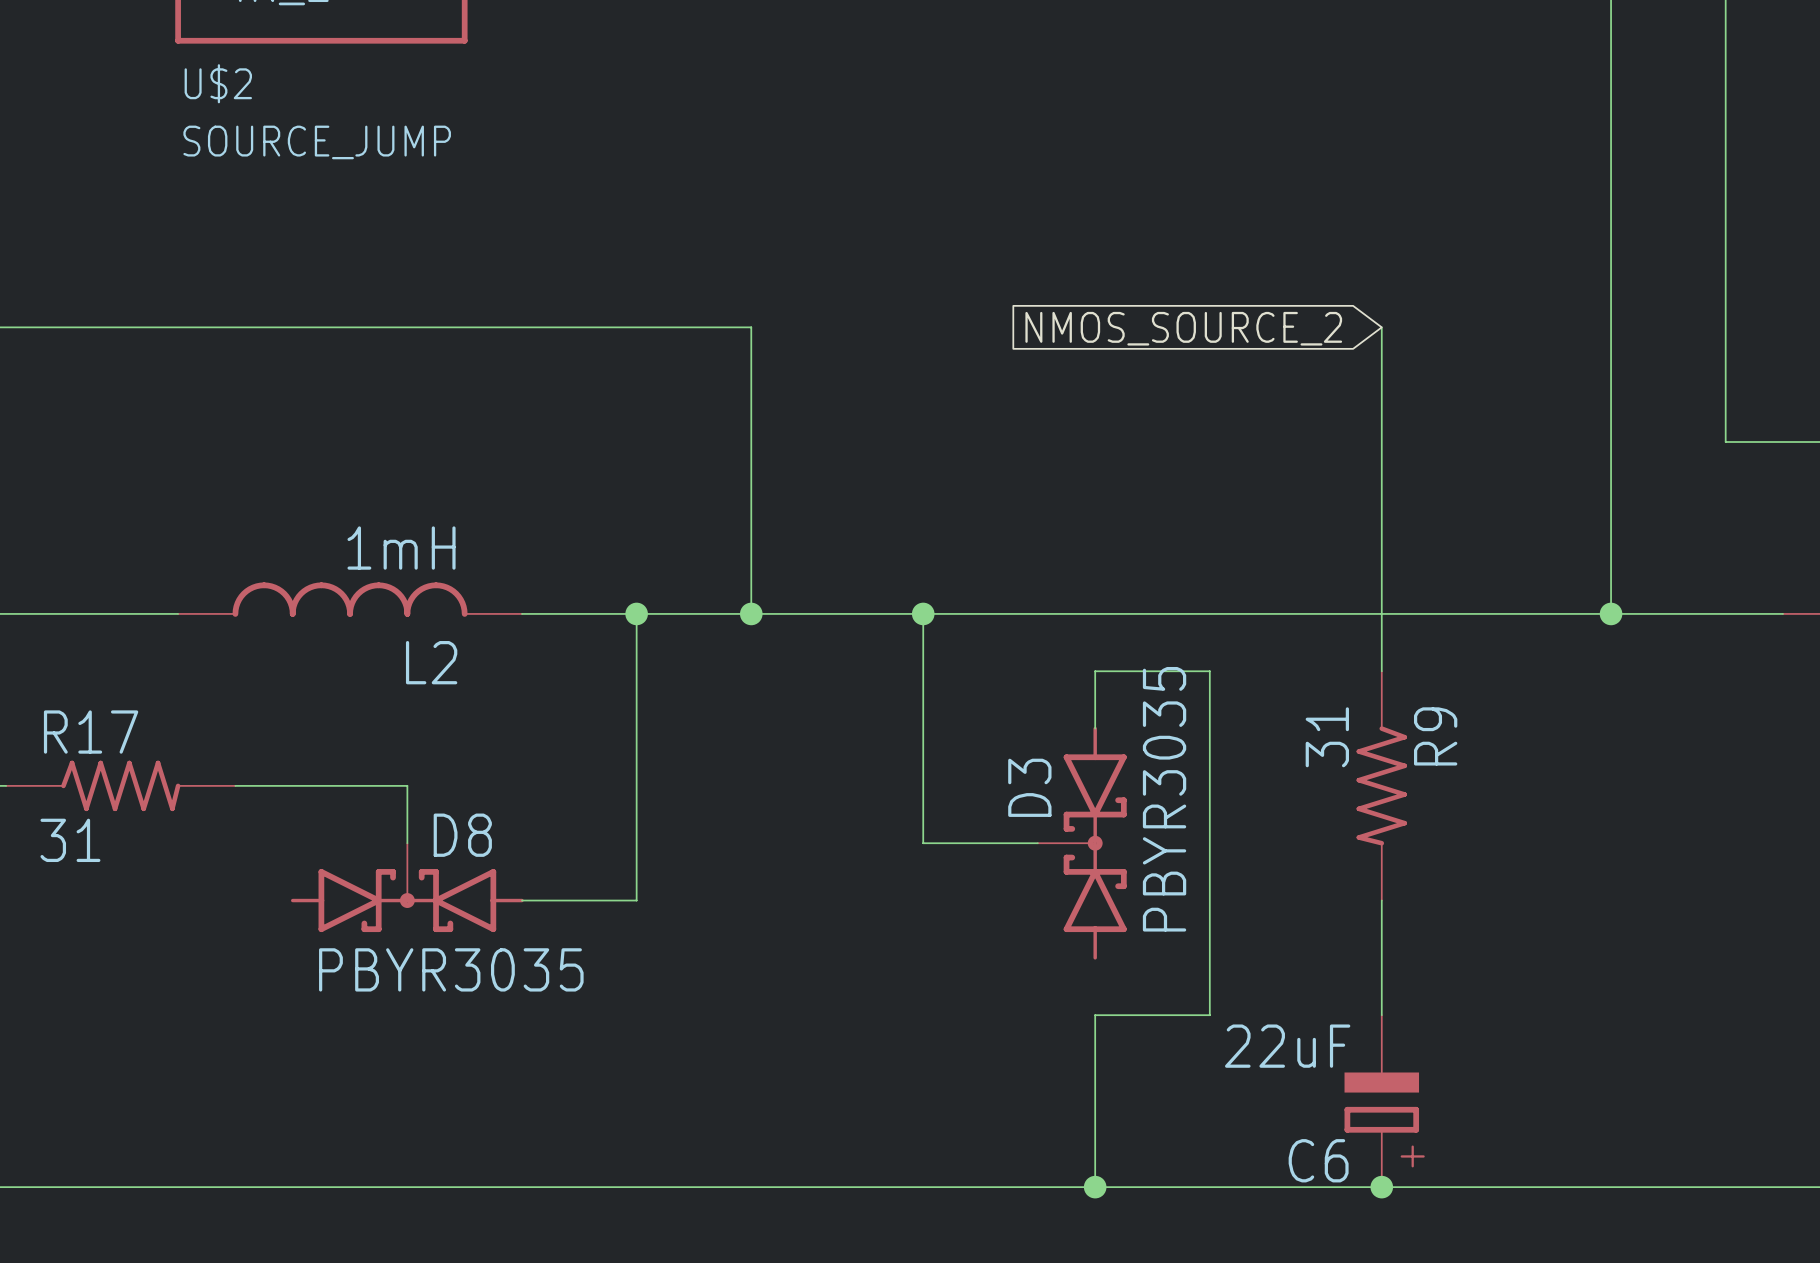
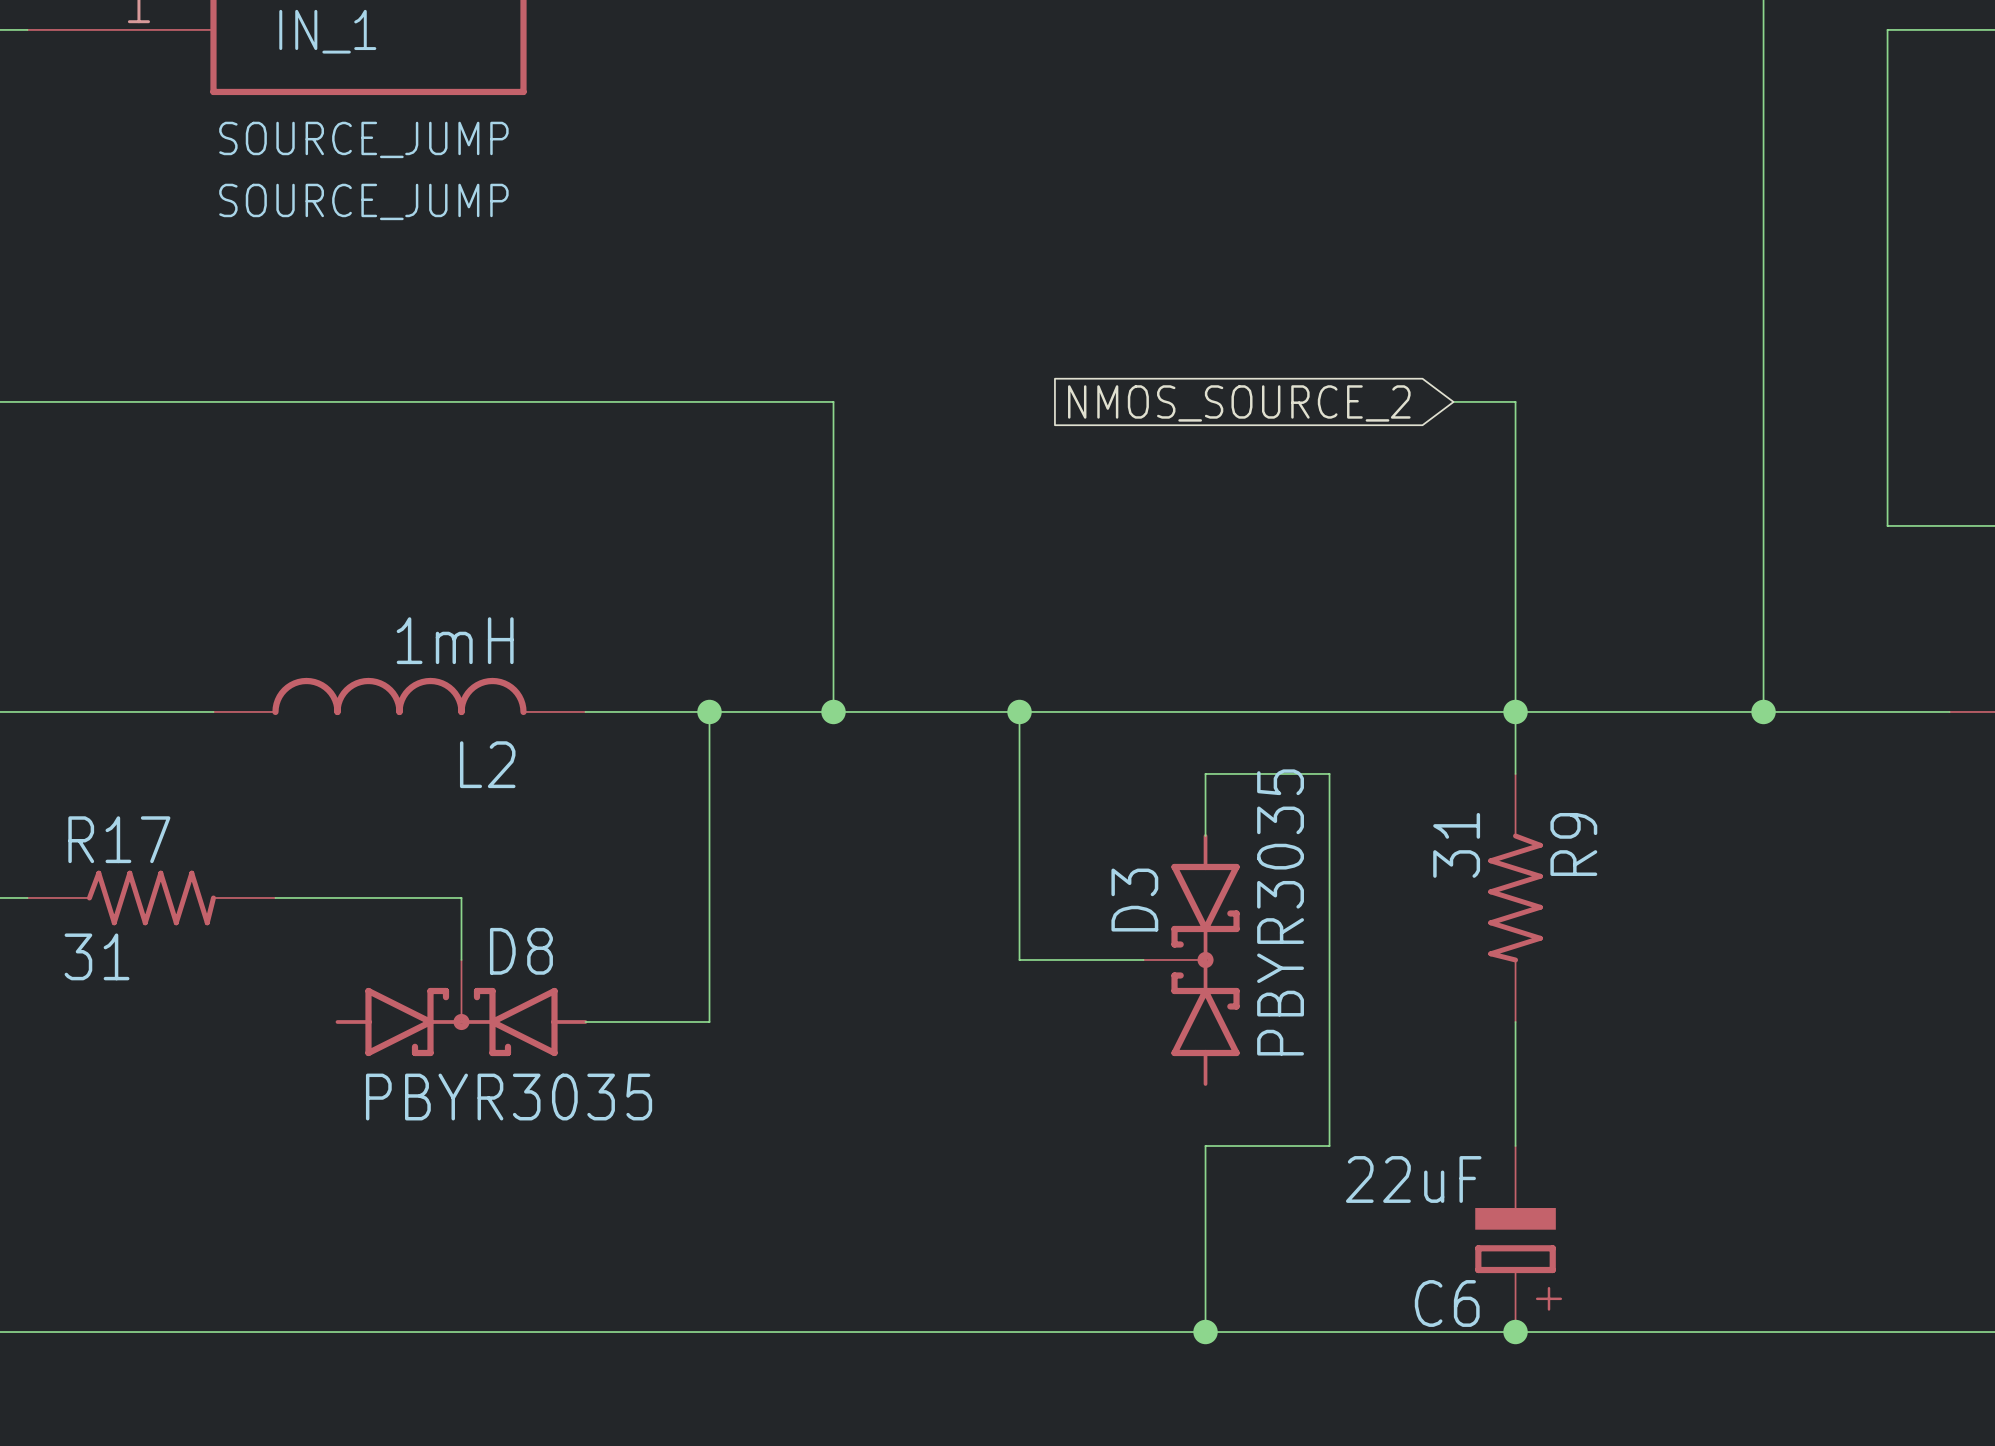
U$2 name: U$2 (218, 83) -> SOURCE_JUMP (363, 139)
wire: none -> (1453, 401) (1515, 401)
global label position: NMOS_SOURCE_2 (1183, 328) -> NMOS_SOURCE_2 (1239, 403)
junction: none -> (1515, 711)

